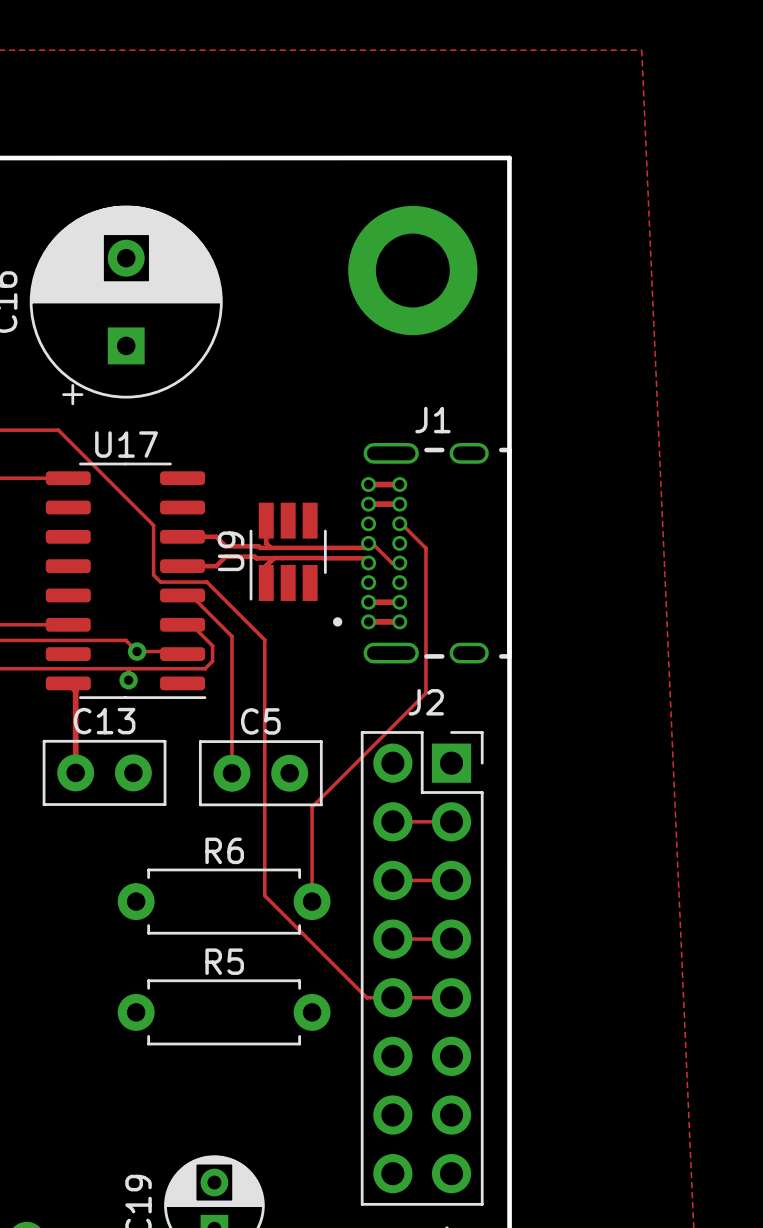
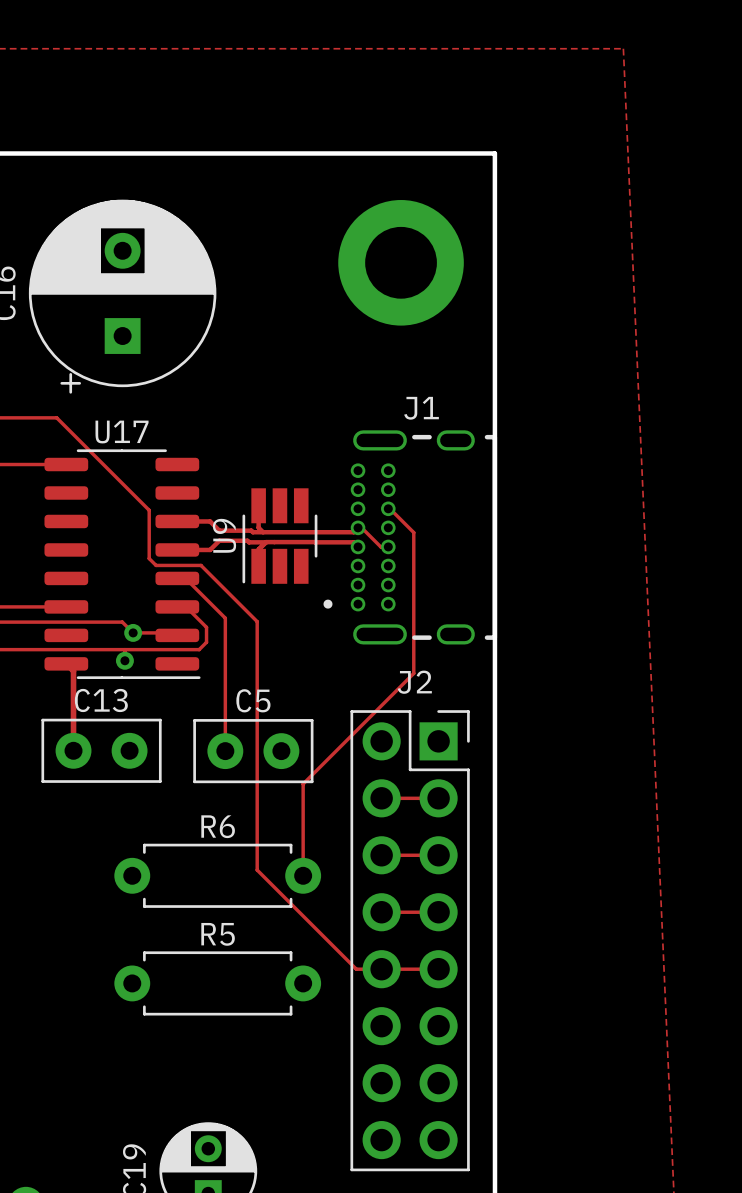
track: (368, 484) (399, 484) -> none
track: (368, 504) (399, 504) -> none
track: (368, 602) (399, 602) -> none
track: (368, 621) (399, 621) -> none

